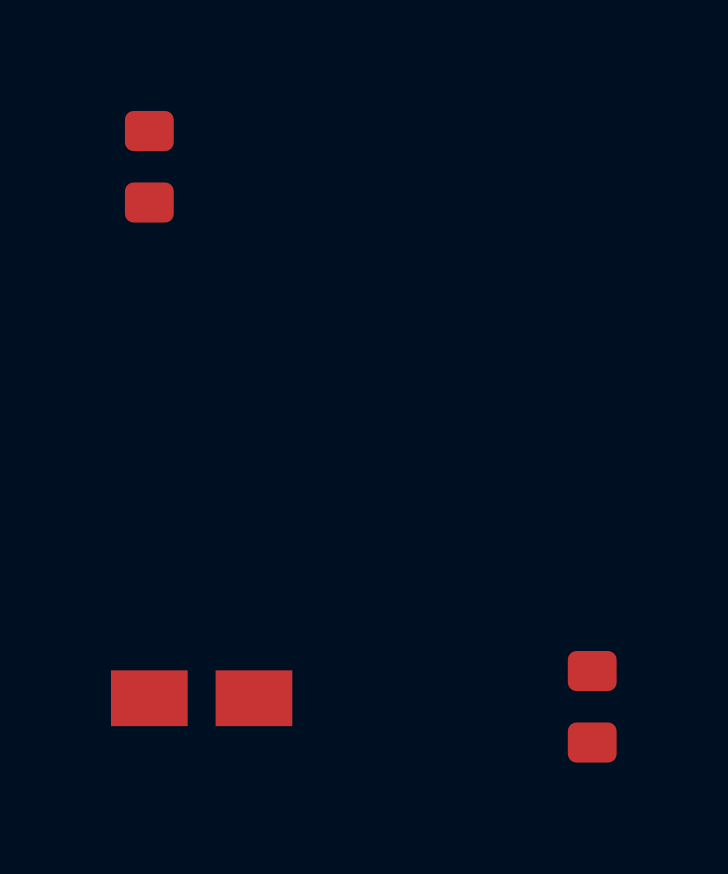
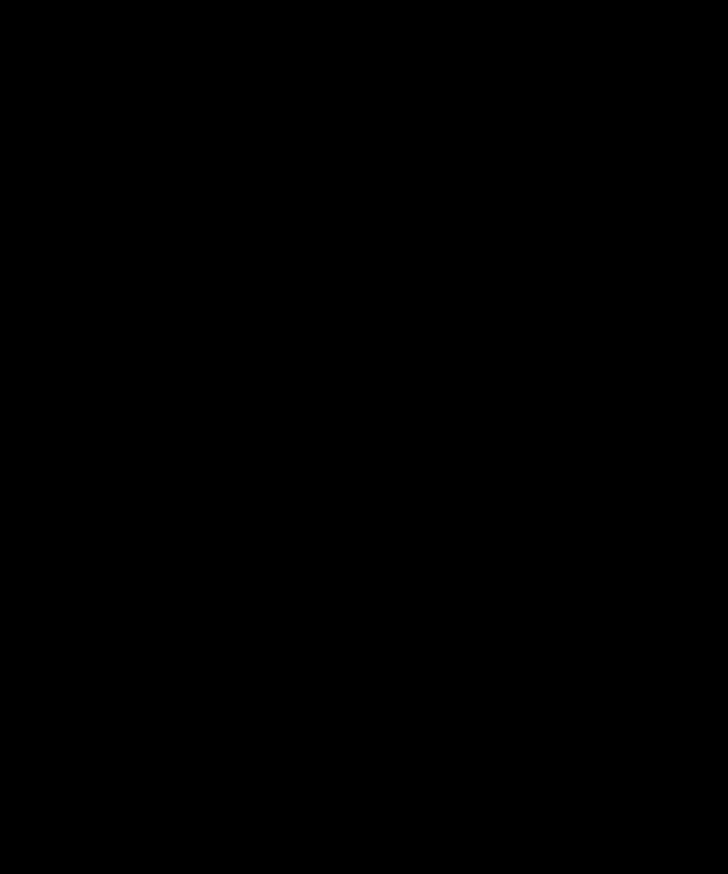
part: (149, 166) -> none
part: (201, 698) -> none
part: (592, 706) -> none

